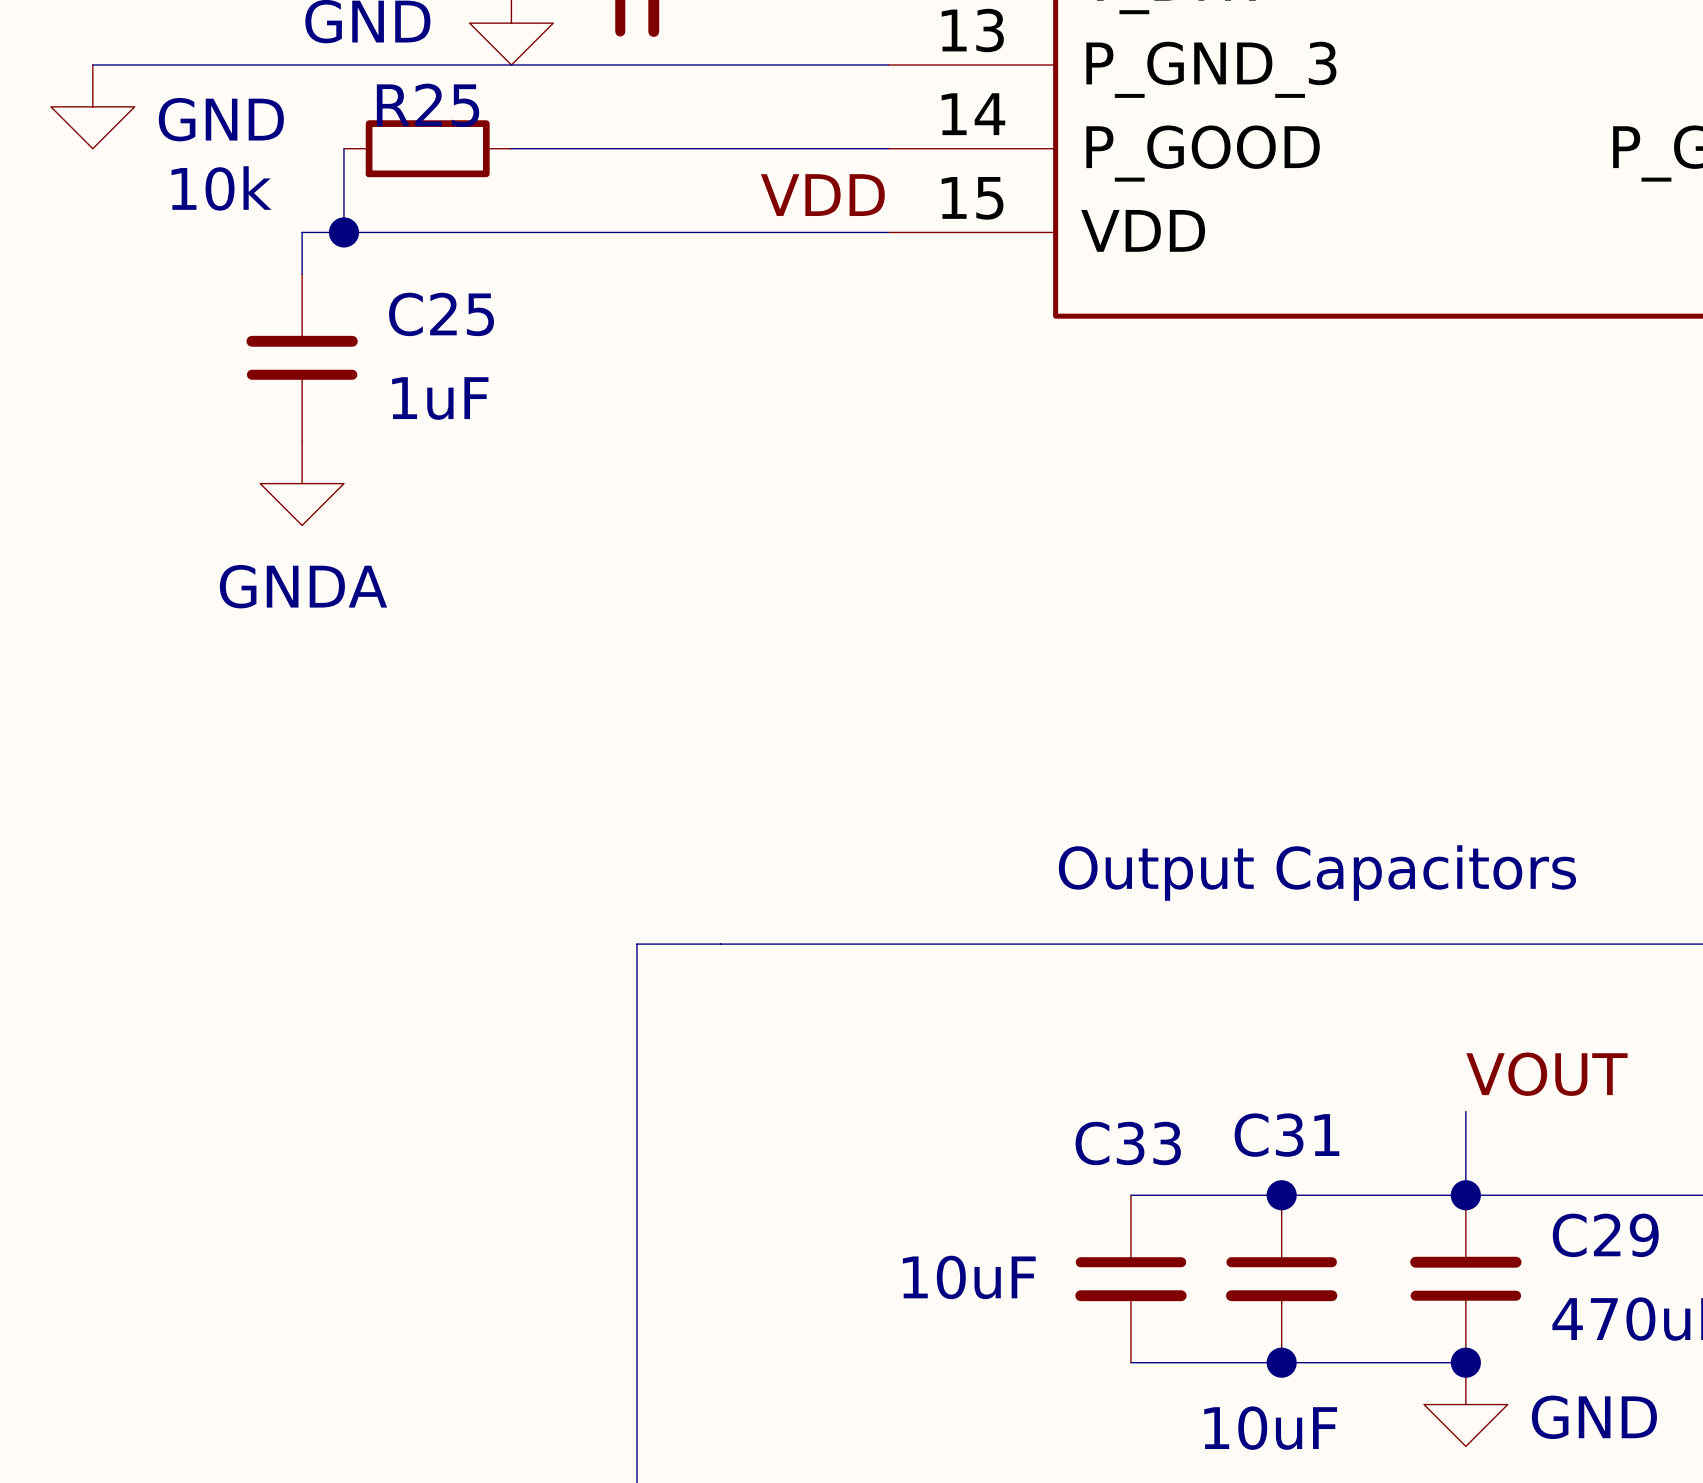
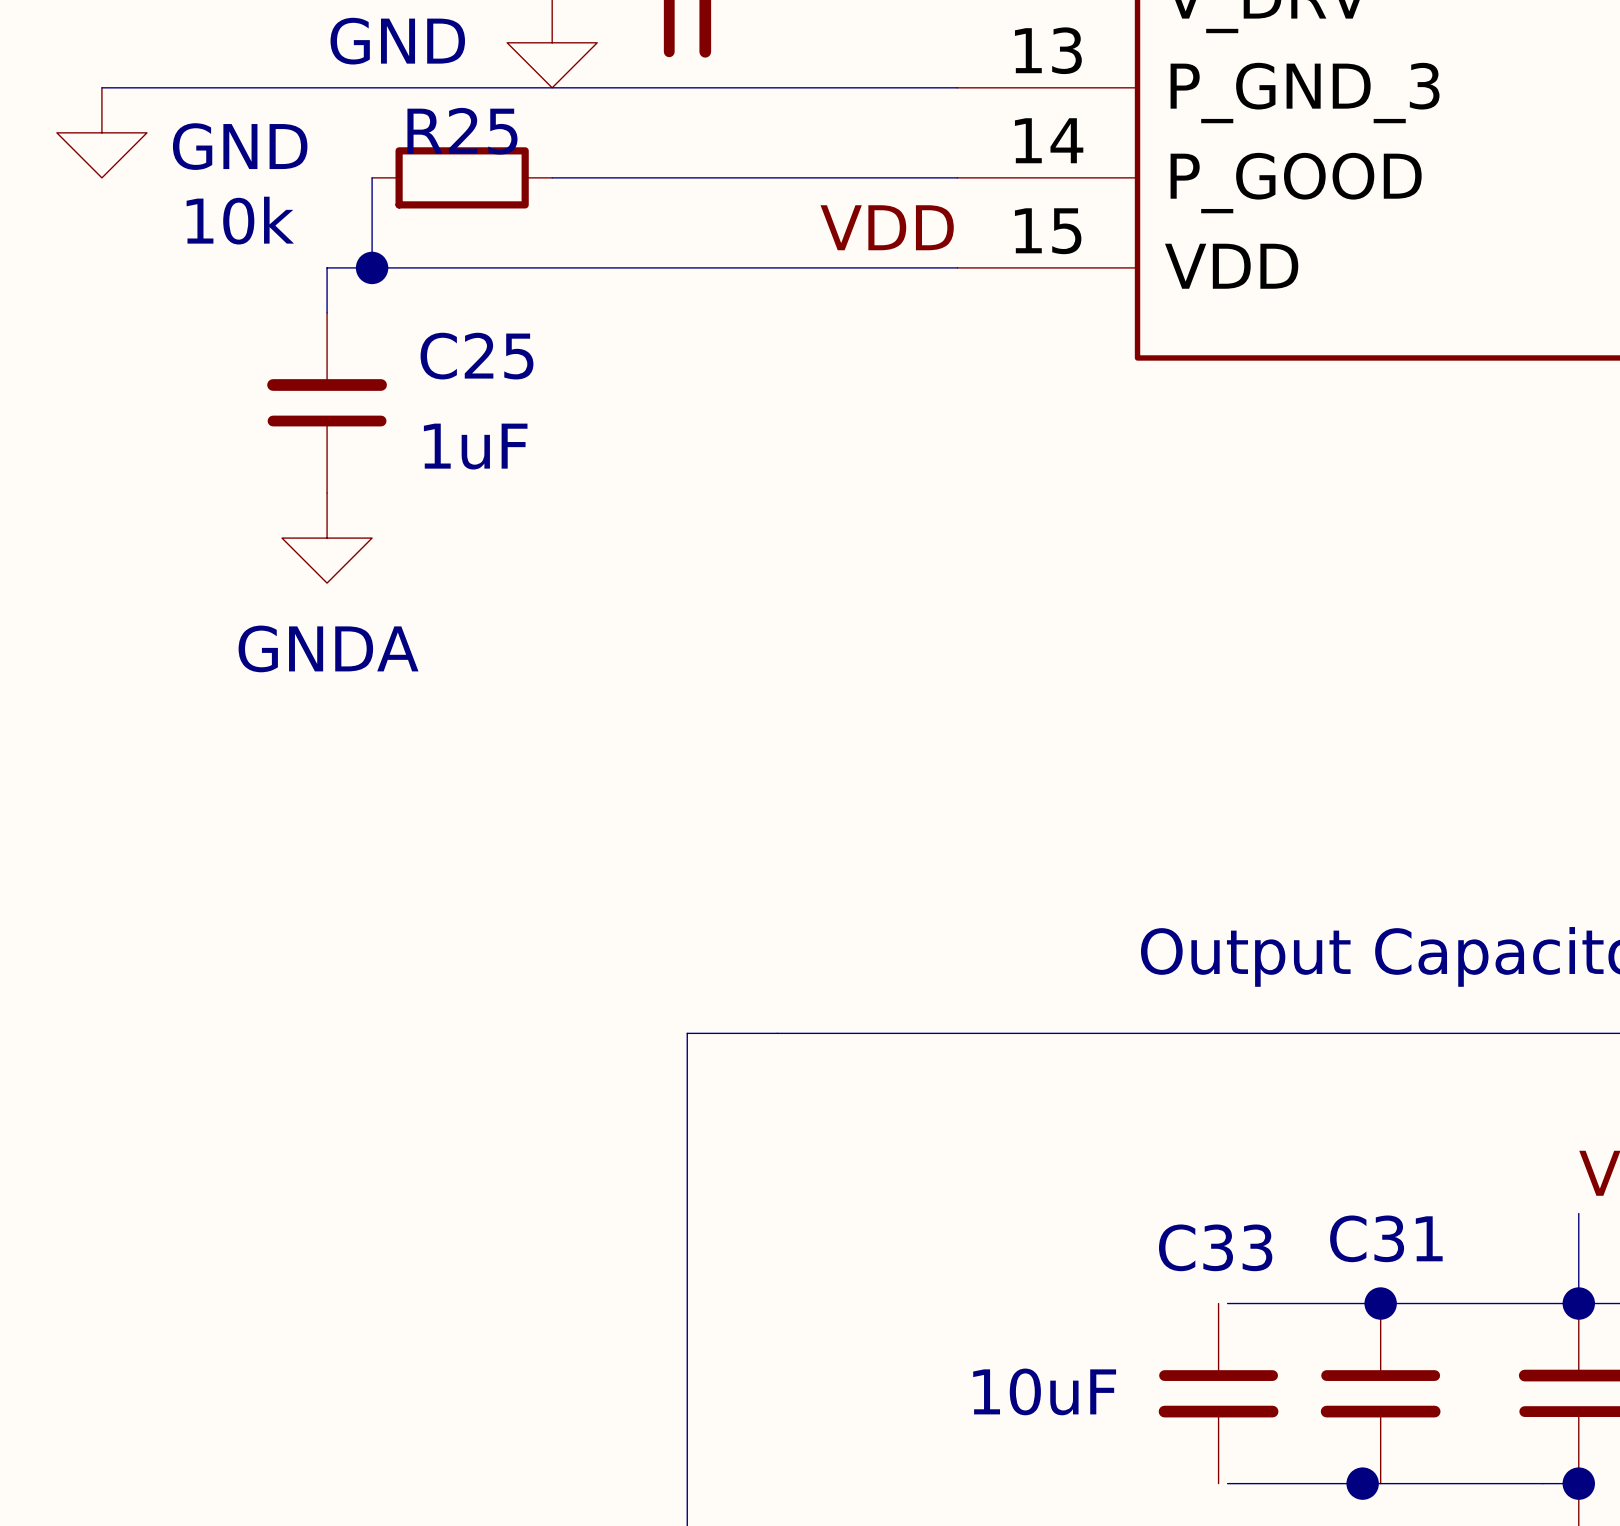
wire: (1130, 1195) (1139, 1195) -> none
wire: (1130, 1362) (1139, 1362) -> none
junction position: (1281, 1362) -> (1362, 1483)

